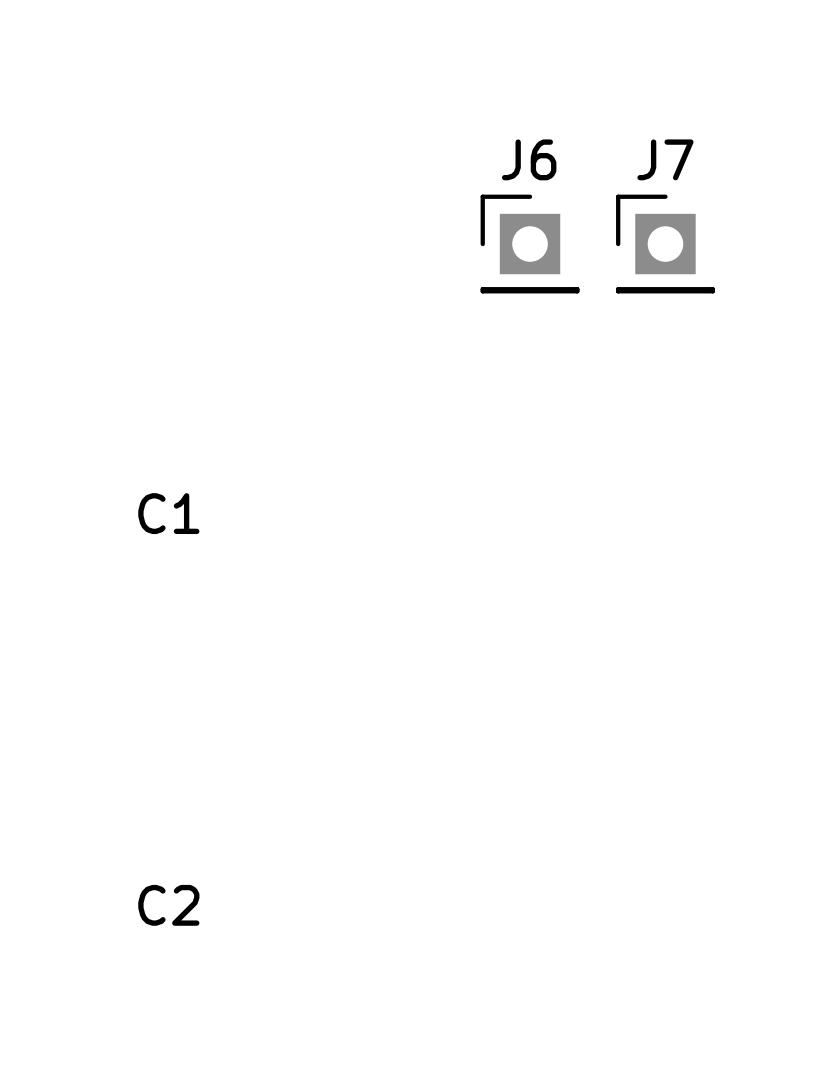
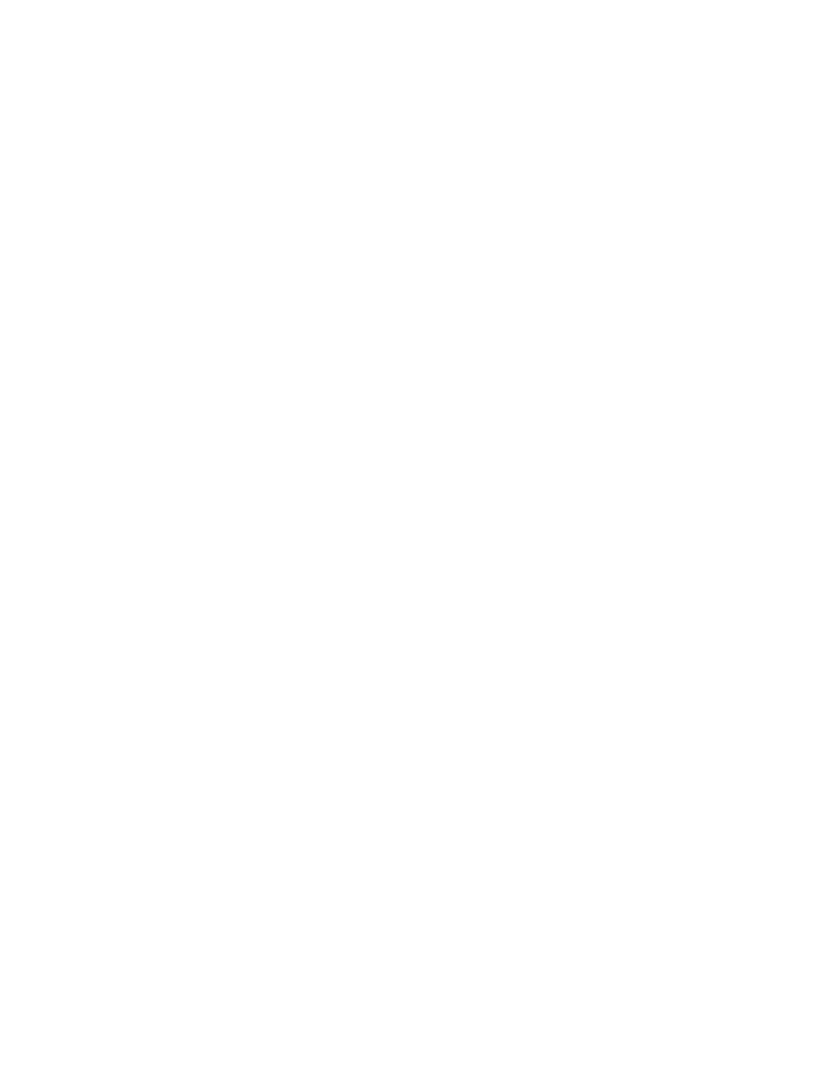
J6: (530, 244) -> none
J7: (665, 244) -> none
C1: (168, 513) -> none
C2: (168, 905) -> none

